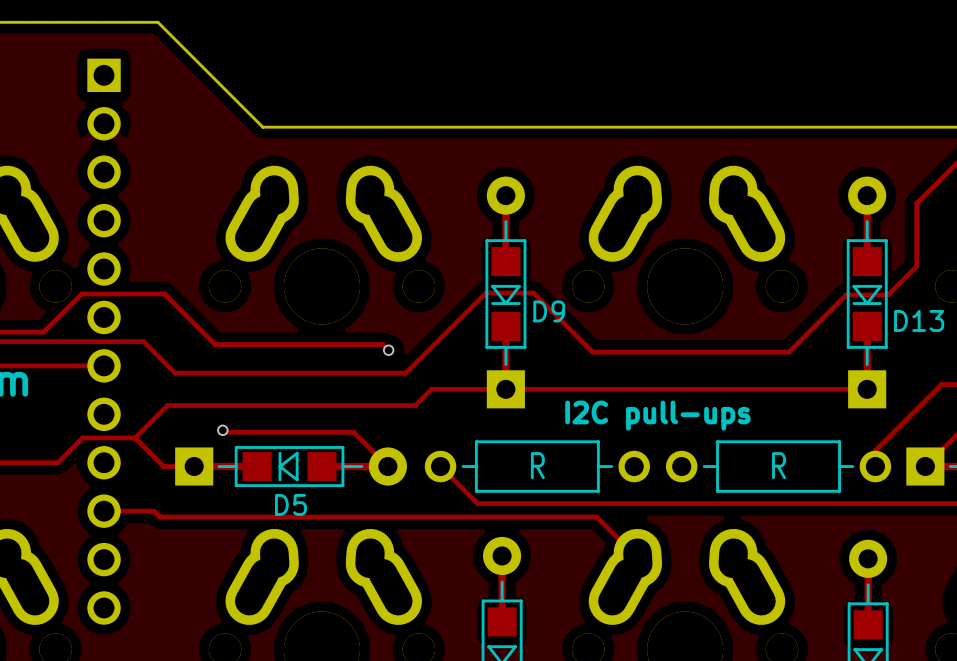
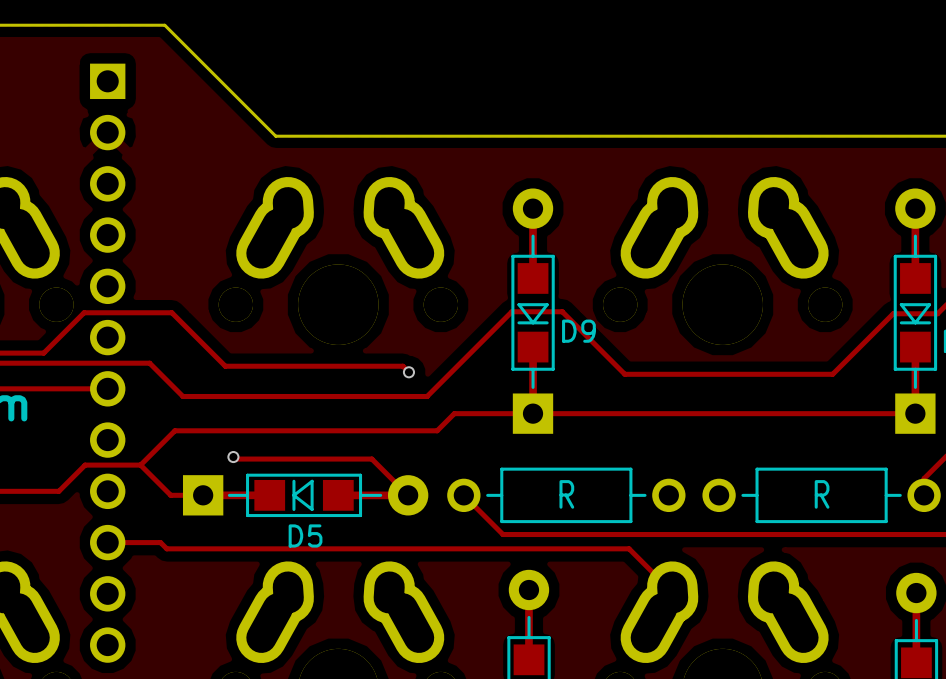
text: I2C pull-ups (657, 415) -> none

